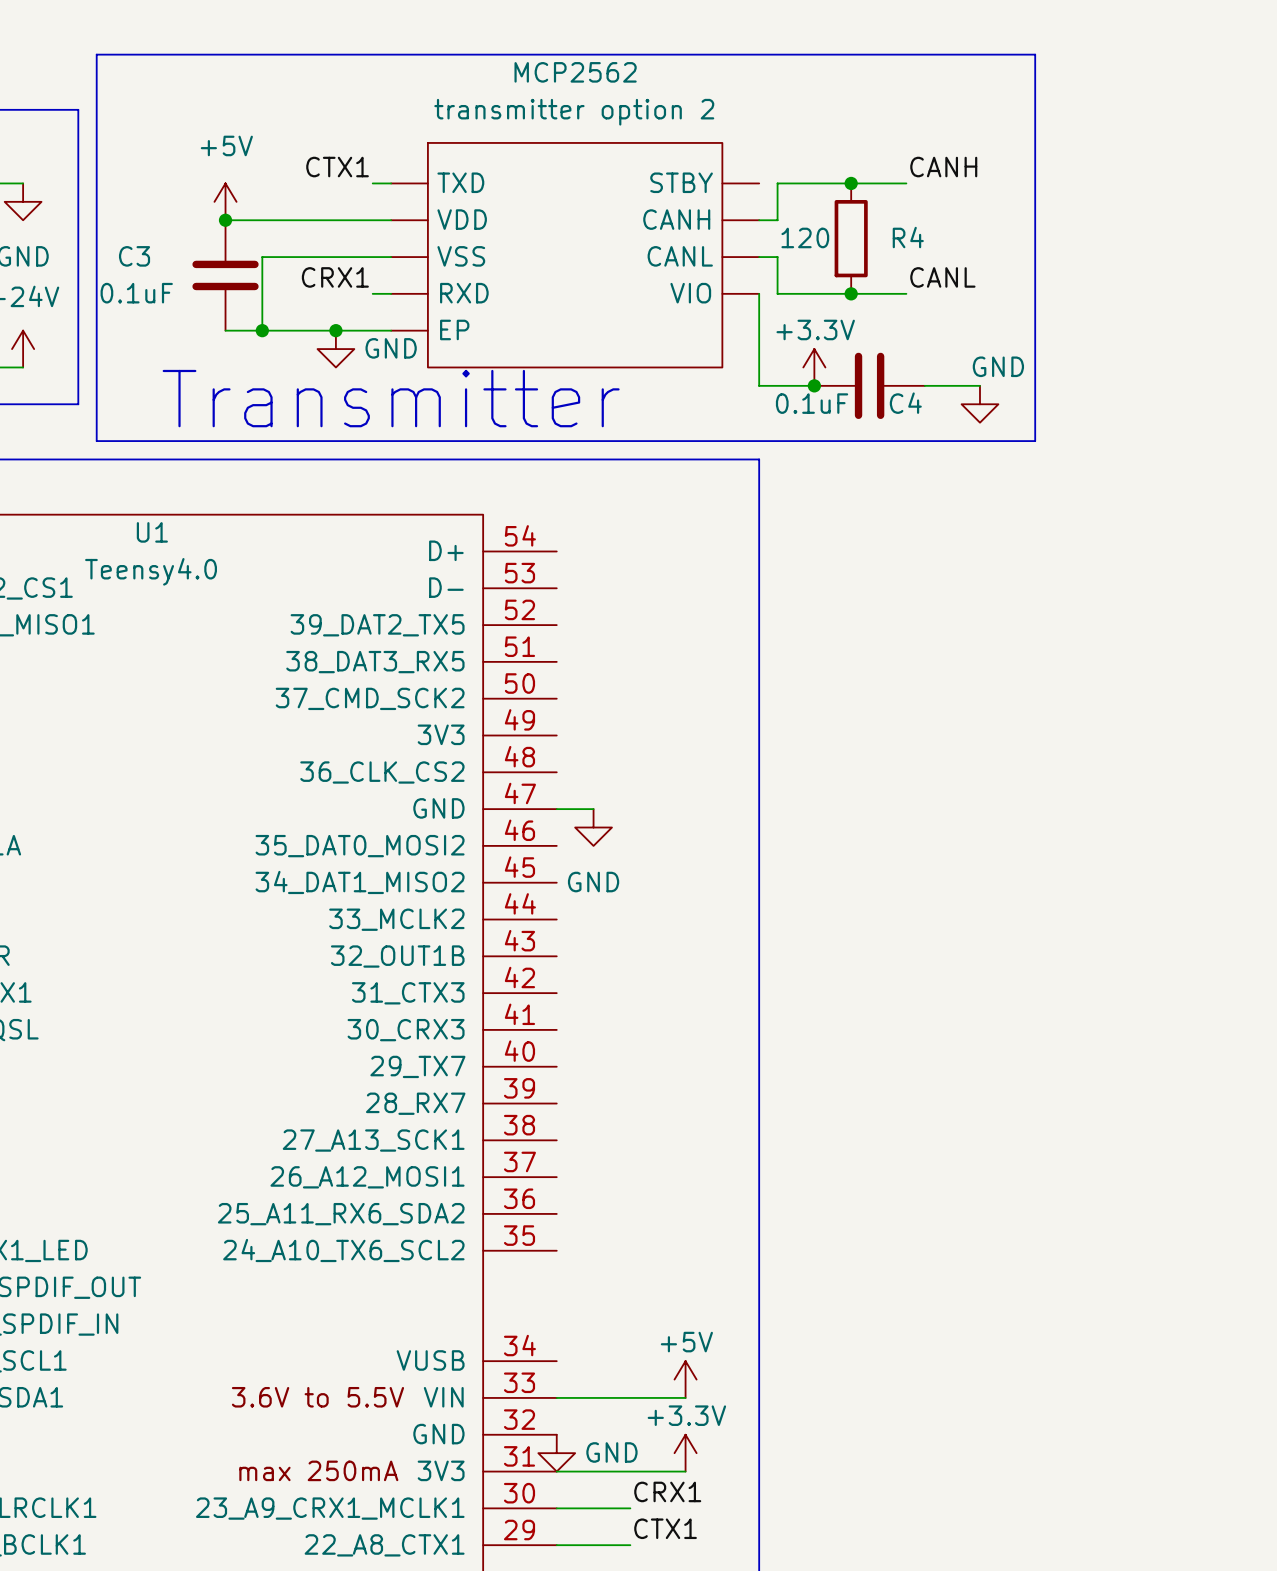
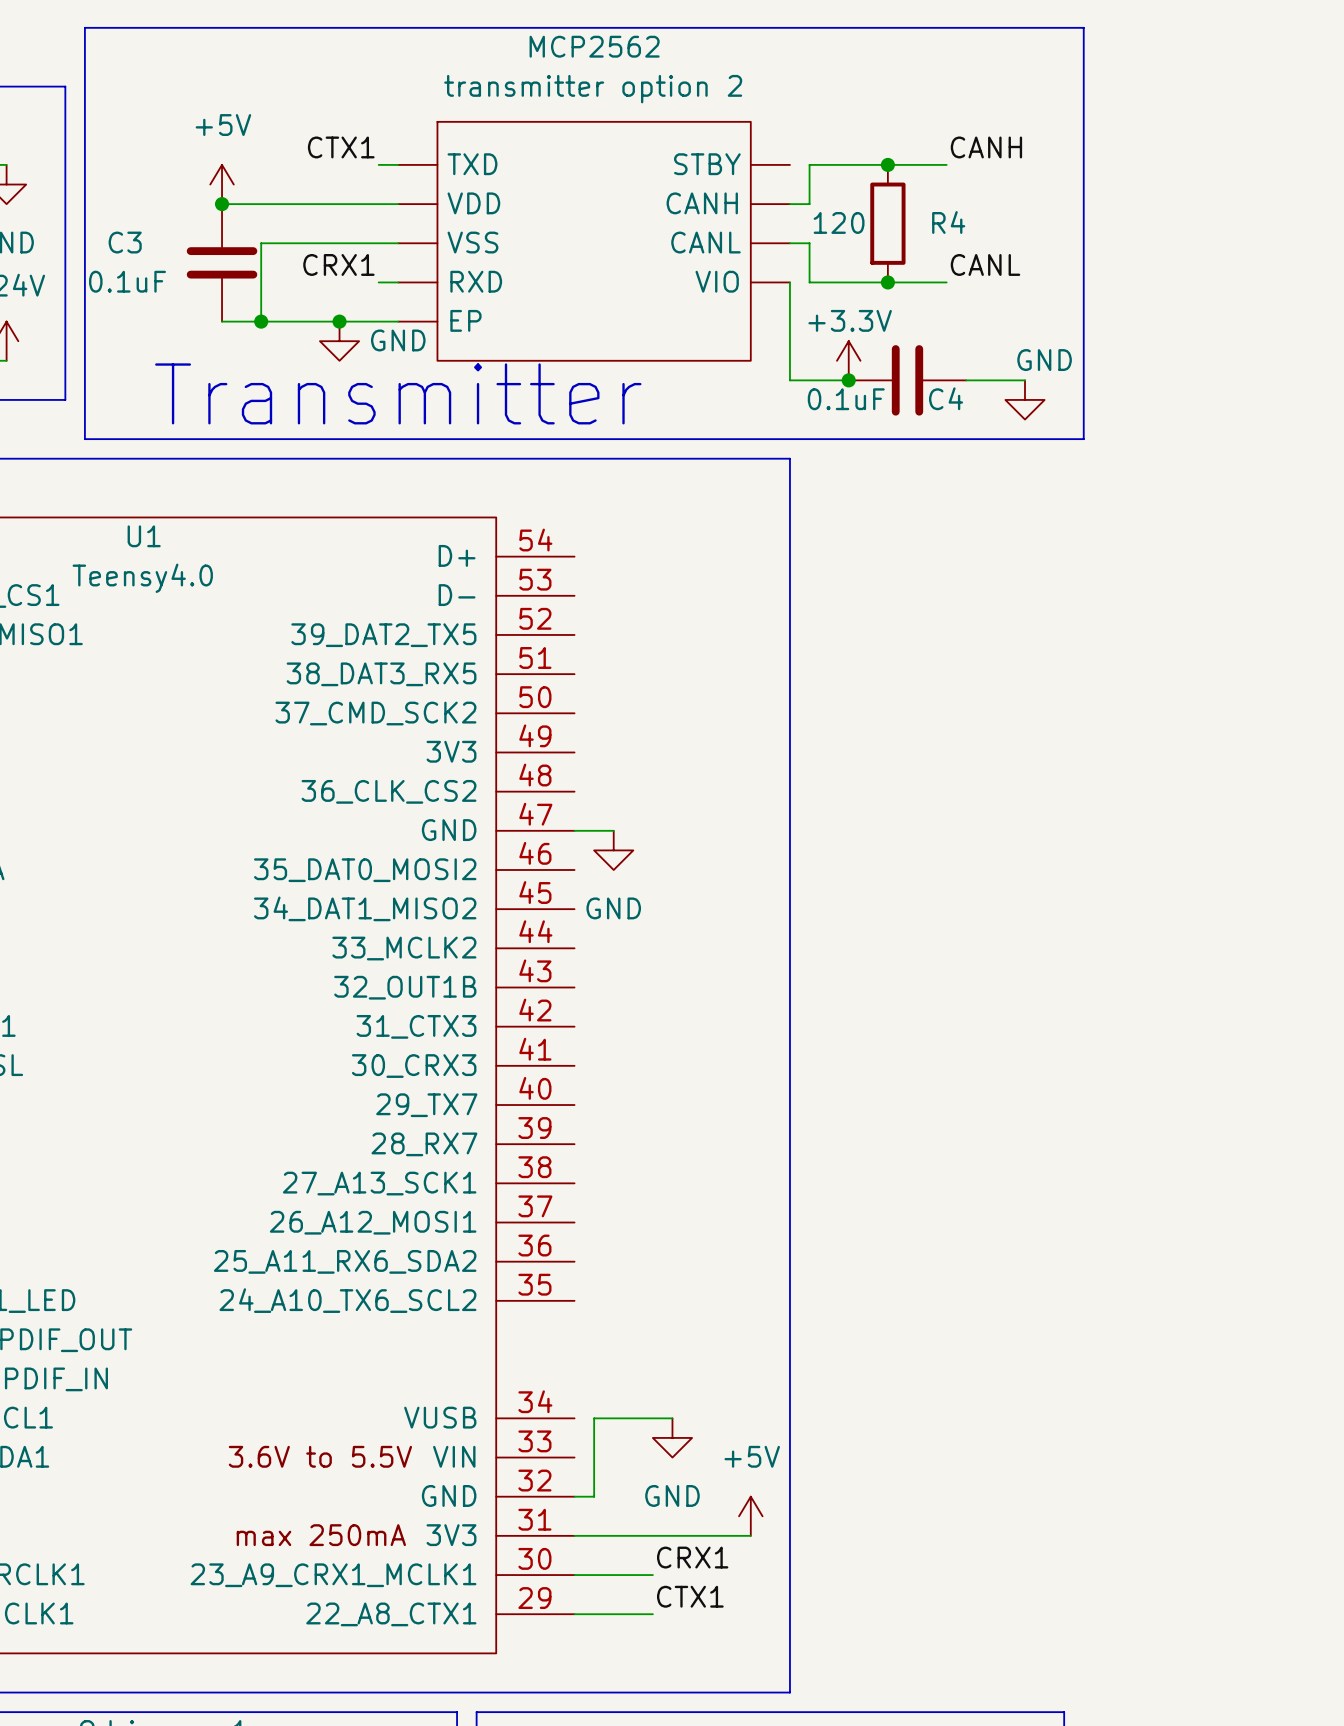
power symbol text position: +5V (686, 1342) -> +5V (752, 1456)
wire: none -> (672, 1418) (594, 1418) (594, 1496) (574, 1496)
power symbol position: +5V (685, 1379) -> +5V (750, 1516)
wire: (556, 1397) (685, 1397) -> none
power symbol text position: GND (611, 1452) -> GND (672, 1495)
power symbol position: GND (556, 1453) -> GND (672, 1437)
power symbol: +3.3V (685, 1453) -> none
wire: none -> (711, 1535) (750, 1535)

